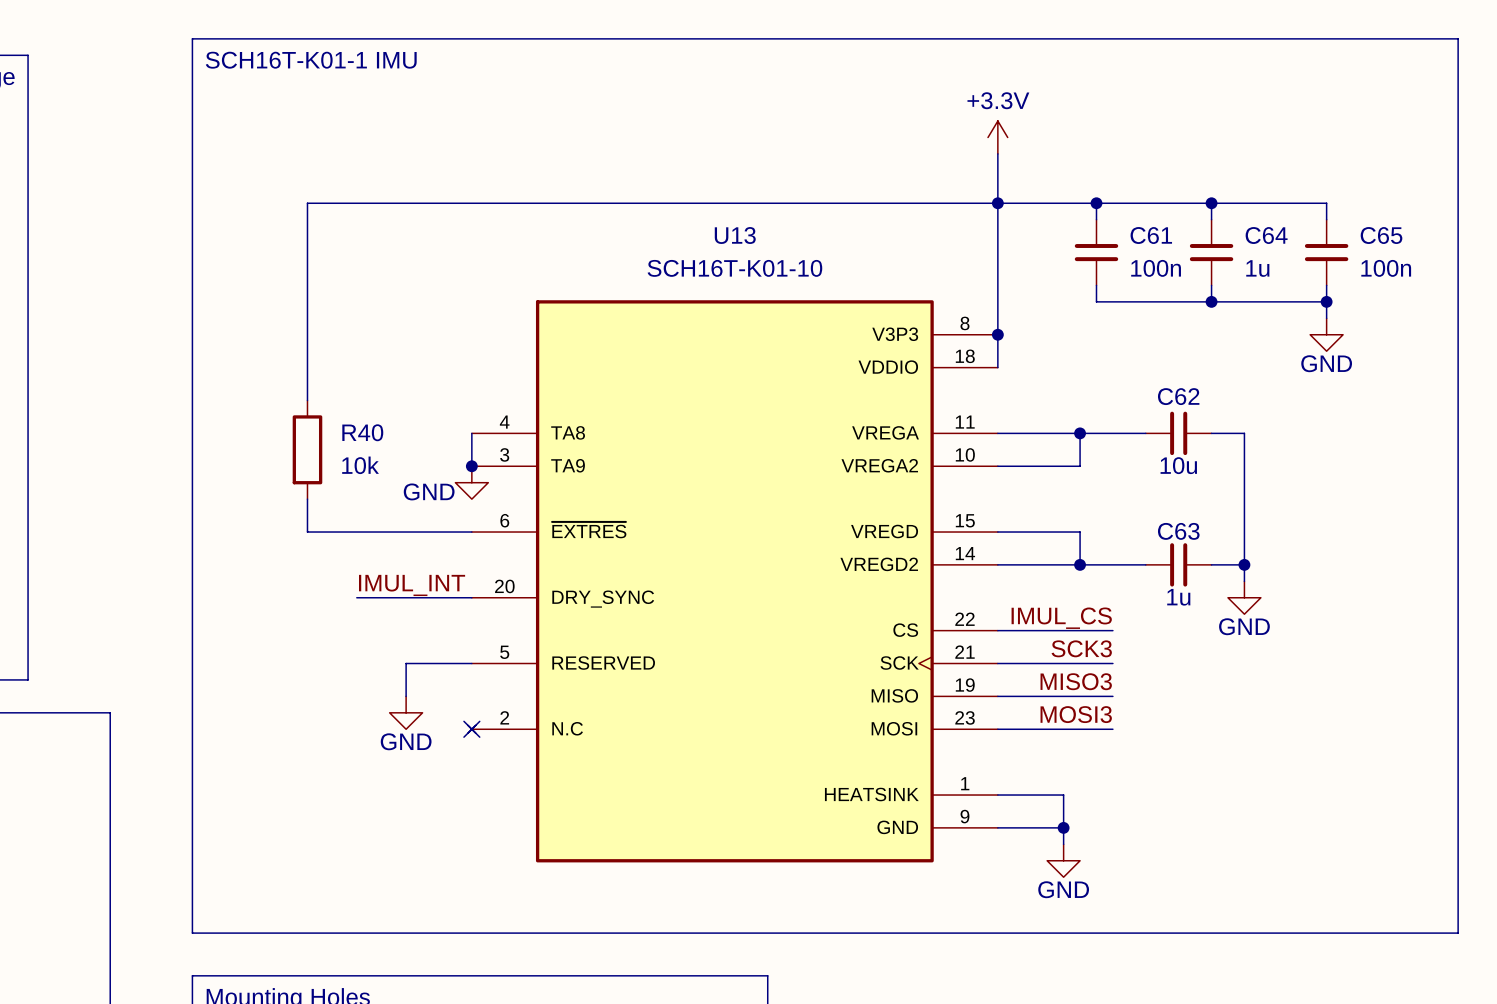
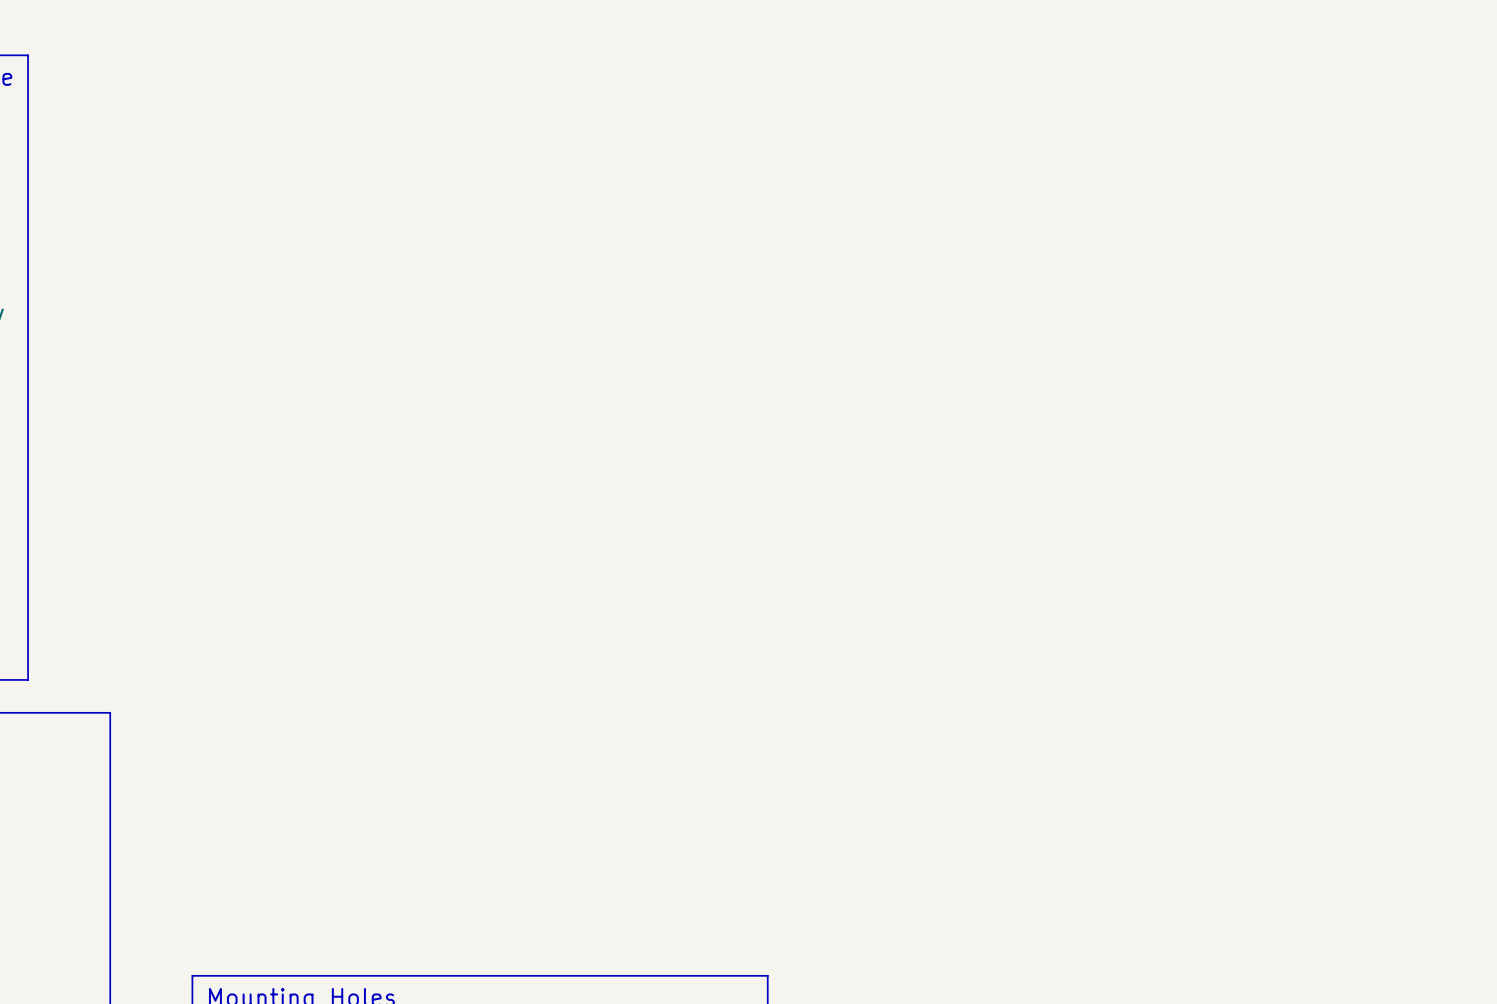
line: (192, 38) (1458, 38) (1458, 933) (192, 933) (192, 38) -> none
text: SCH16T-K01-1 IMU (311, 60) -> none
power symbol: +3.3V (997, 137) -> none
wire: (997, 153) (997, 367) -> none
junction: (997, 203) -> none
wire: (1096, 203) (1096, 219) -> none
junction: (1096, 203) -> none
wire: (1211, 203) (1211, 219) -> none
junction: (1211, 203) -> none
wire: (1326, 219) (1326, 203) (307, 203) (307, 400) -> none
C61: 100n (1096, 252) -> none
C64: 1u (1211, 252) -> none
C65: 100n (1326, 252) -> none
wire: (1096, 285) (1096, 301) (1326, 301) -> none
wire: (1211, 285) (1211, 301) -> none
wire: (1326, 285) (1326, 318) -> none
junction: (1211, 301) -> none
junction: (1326, 301) -> none
junction: (997, 334) -> none
power symbol: GND (1326, 334) -> none
wire: (471, 433) (471, 466) -> none
wire: (997, 433) (1145, 433) -> none
wire: (1080, 433) (1080, 466) (997, 466) -> none
junction: (1080, 433) -> none
C62: 10u (1178, 433) -> none
wire: (1211, 433) (1244, 433) (1244, 581) -> none
R40: 10k (307, 449) -> none
junction: (471, 466) -> none
power symbol: GND (471, 482) -> none
wire: (307, 499) (307, 532) (471, 532) -> none
wire: (997, 532) (1080, 532) (1080, 564) -> none
wire: (997, 564) (1145, 564) -> none
junction: (1080, 564) -> none
C63: 1u (1178, 564) -> none
wire: (1211, 564) (1244, 564) -> none
junction: (1244, 564) -> none
U13: SCH16T-K01-10 (732, 581) -> none
label: IMUL_INT (412, 585) -> none
wire: (356, 597) (471, 597) -> none
power symbol: GND (1244, 597) -> none
label: IMUL_CS (1061, 618) -> none
wire: (997, 630) (1112, 630) -> none
label: SCK3 (1081, 648) -> none
wire: (471, 663) (406, 663) (406, 696) -> none
wire: (997, 663) (1112, 663) -> none
label: MISO3 (1076, 681) -> none
wire: (997, 696) (1112, 696) -> none
power symbol: GND (406, 712) -> none
label: MOSI3 (1076, 714) -> none
no-connect mark: (471, 729) -> none
wire: (997, 729) (1112, 729) -> none
wire: (997, 795) (1063, 795) (1063, 844) -> none
wire: (997, 827) (1063, 827) -> none
junction: (1063, 827) -> none
power symbol: GND (1063, 860) -> none

